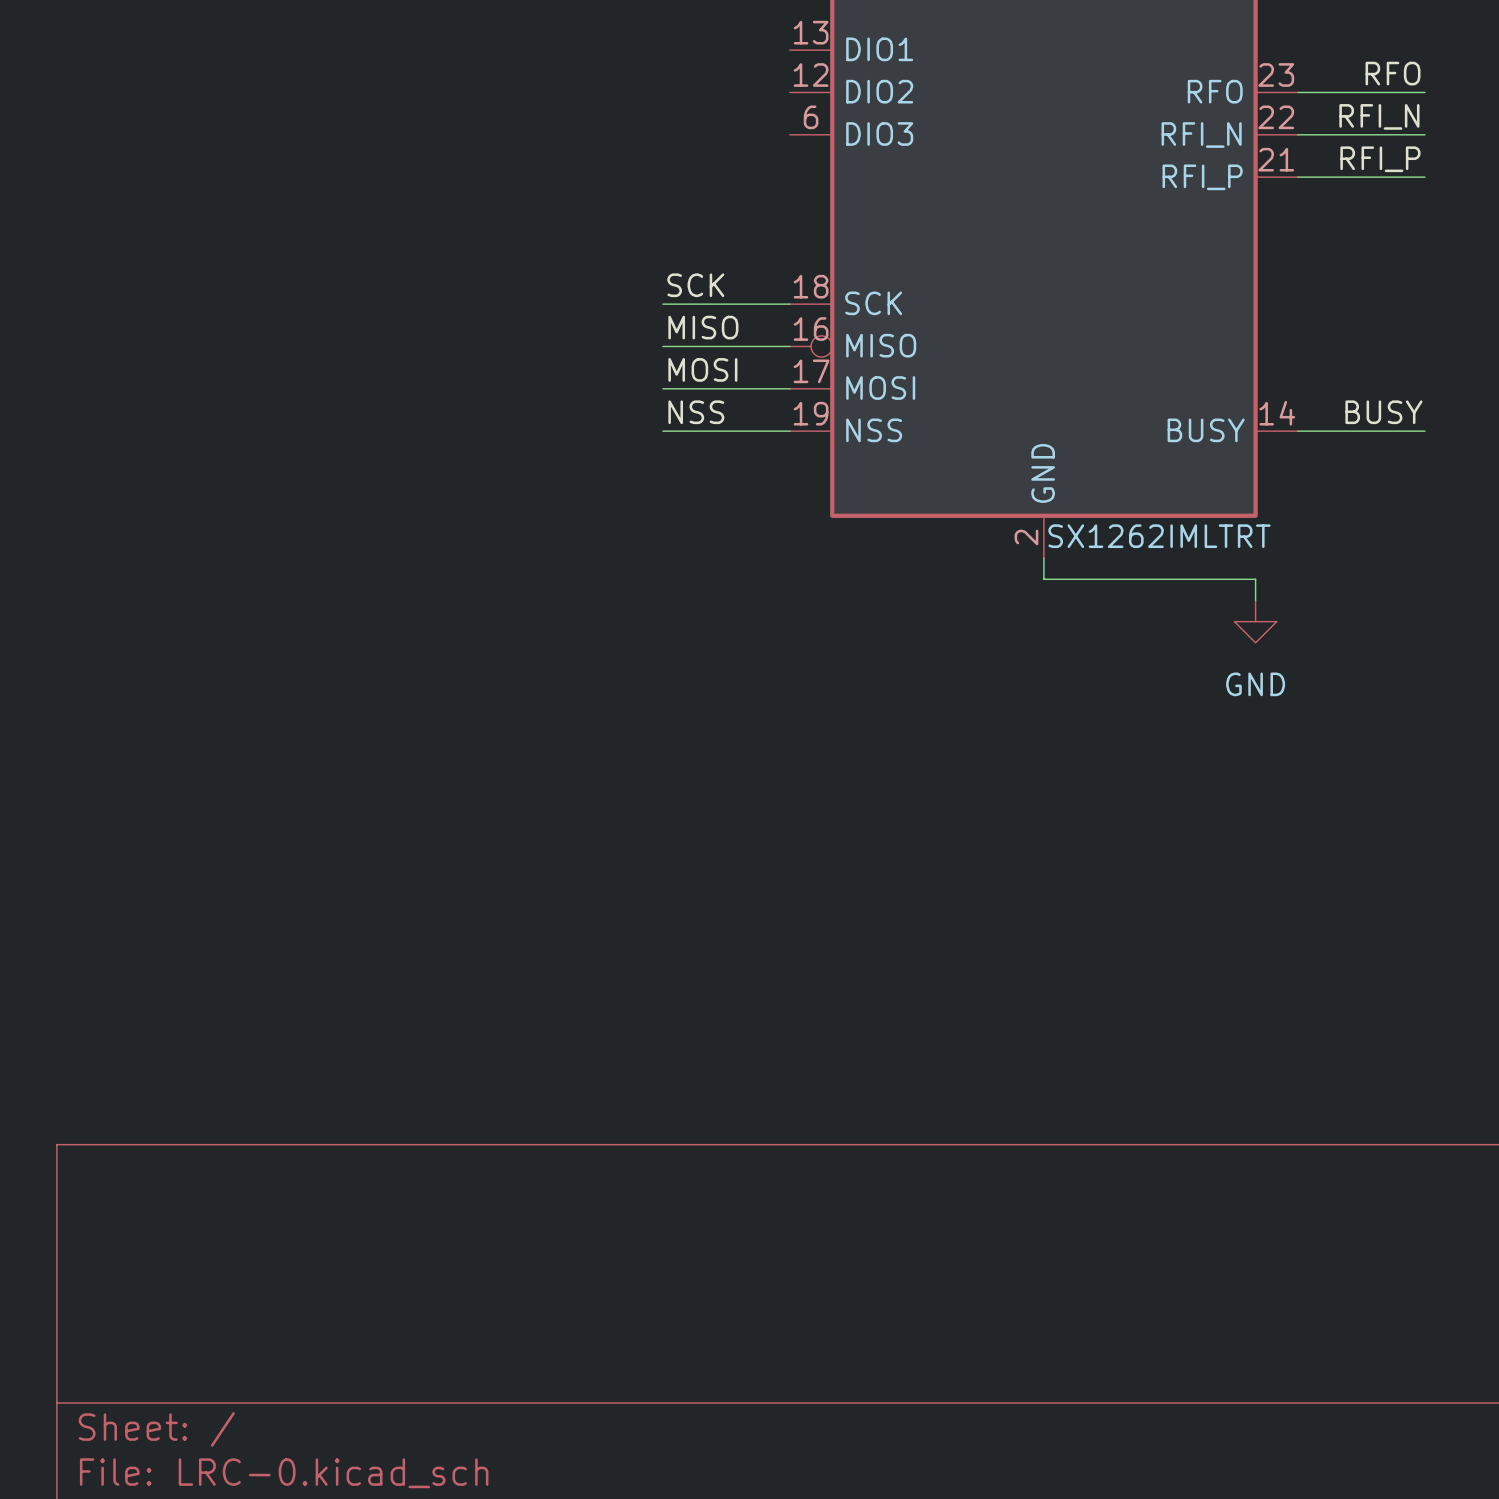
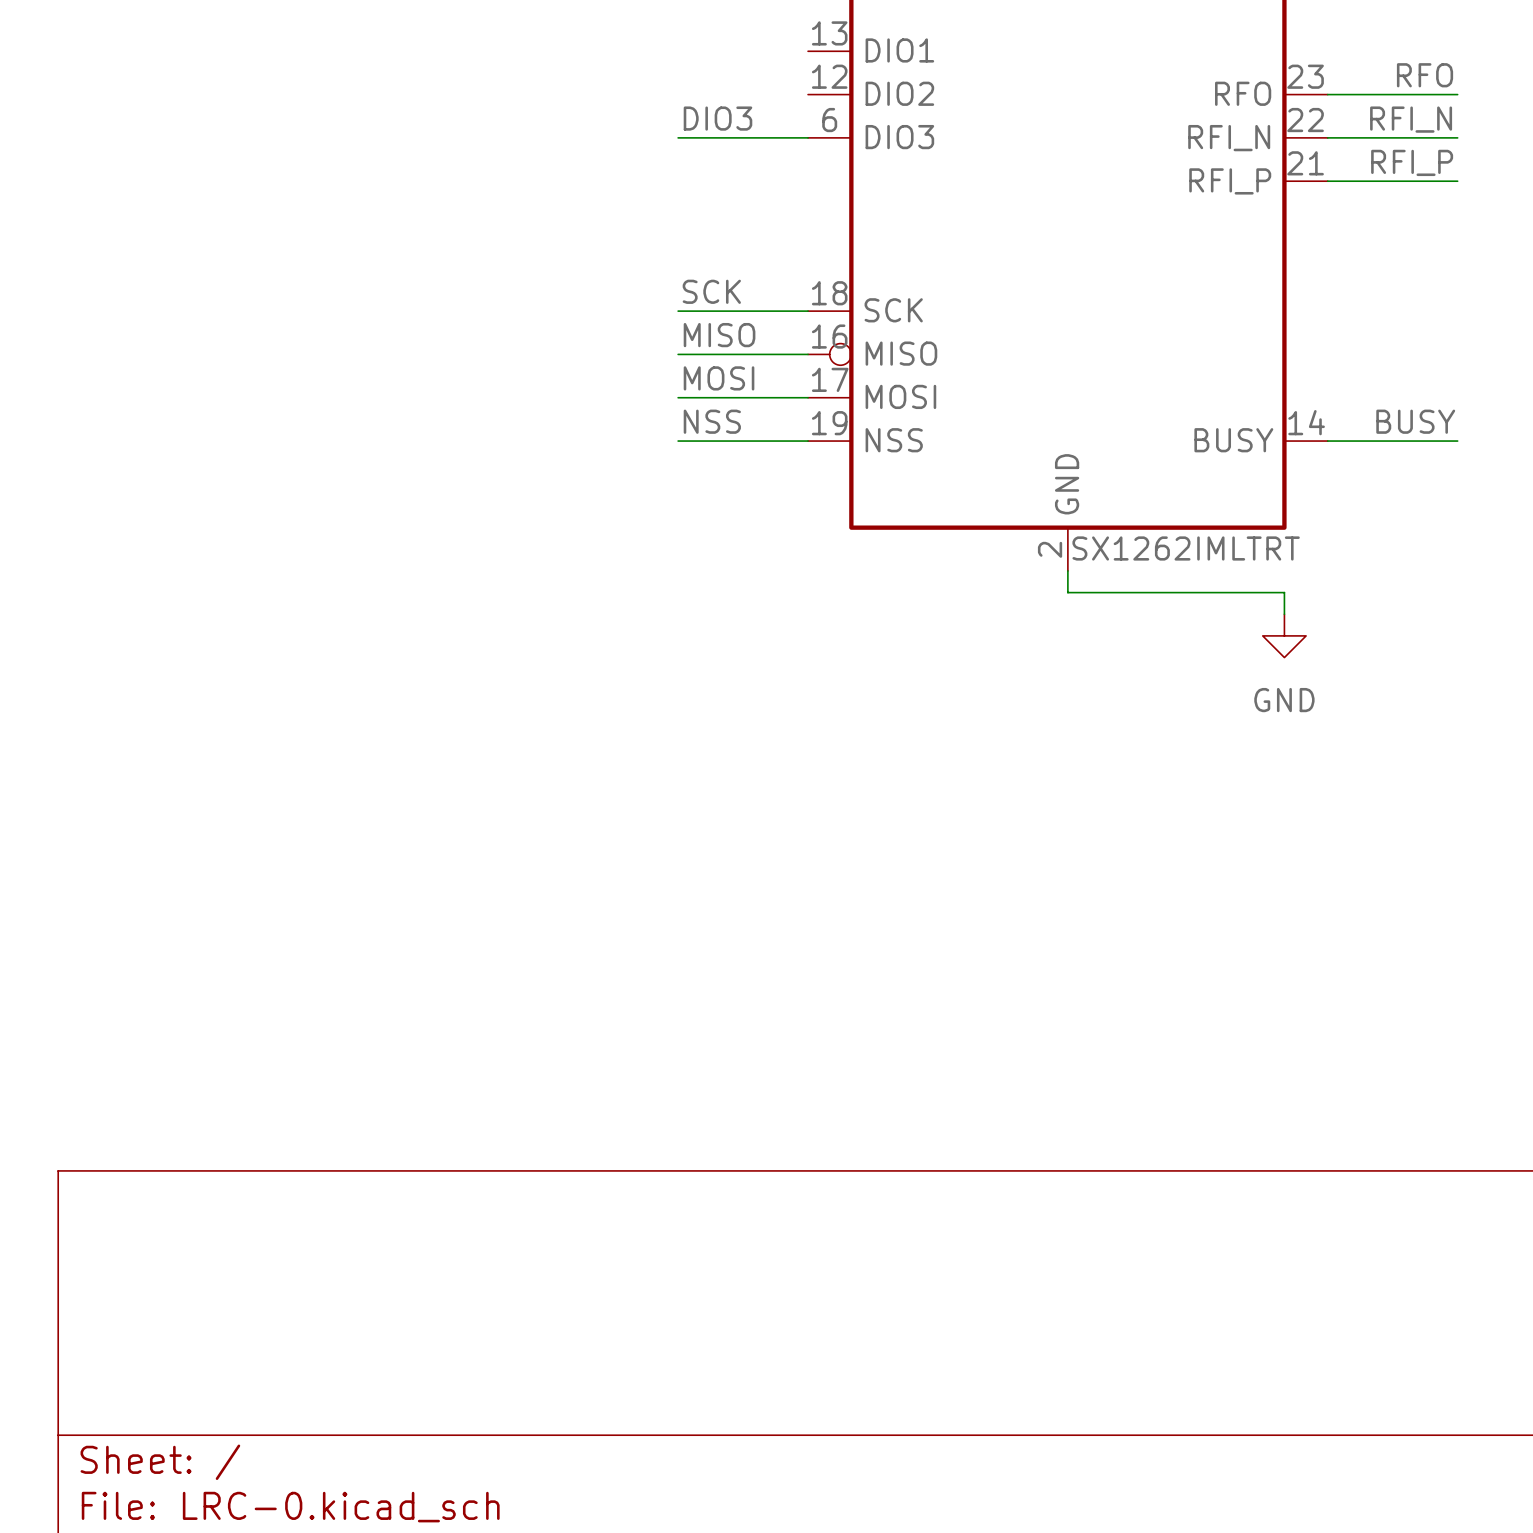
label: none -> DIO3 (717, 118)
wire: none -> (678, 137) (808, 137)

